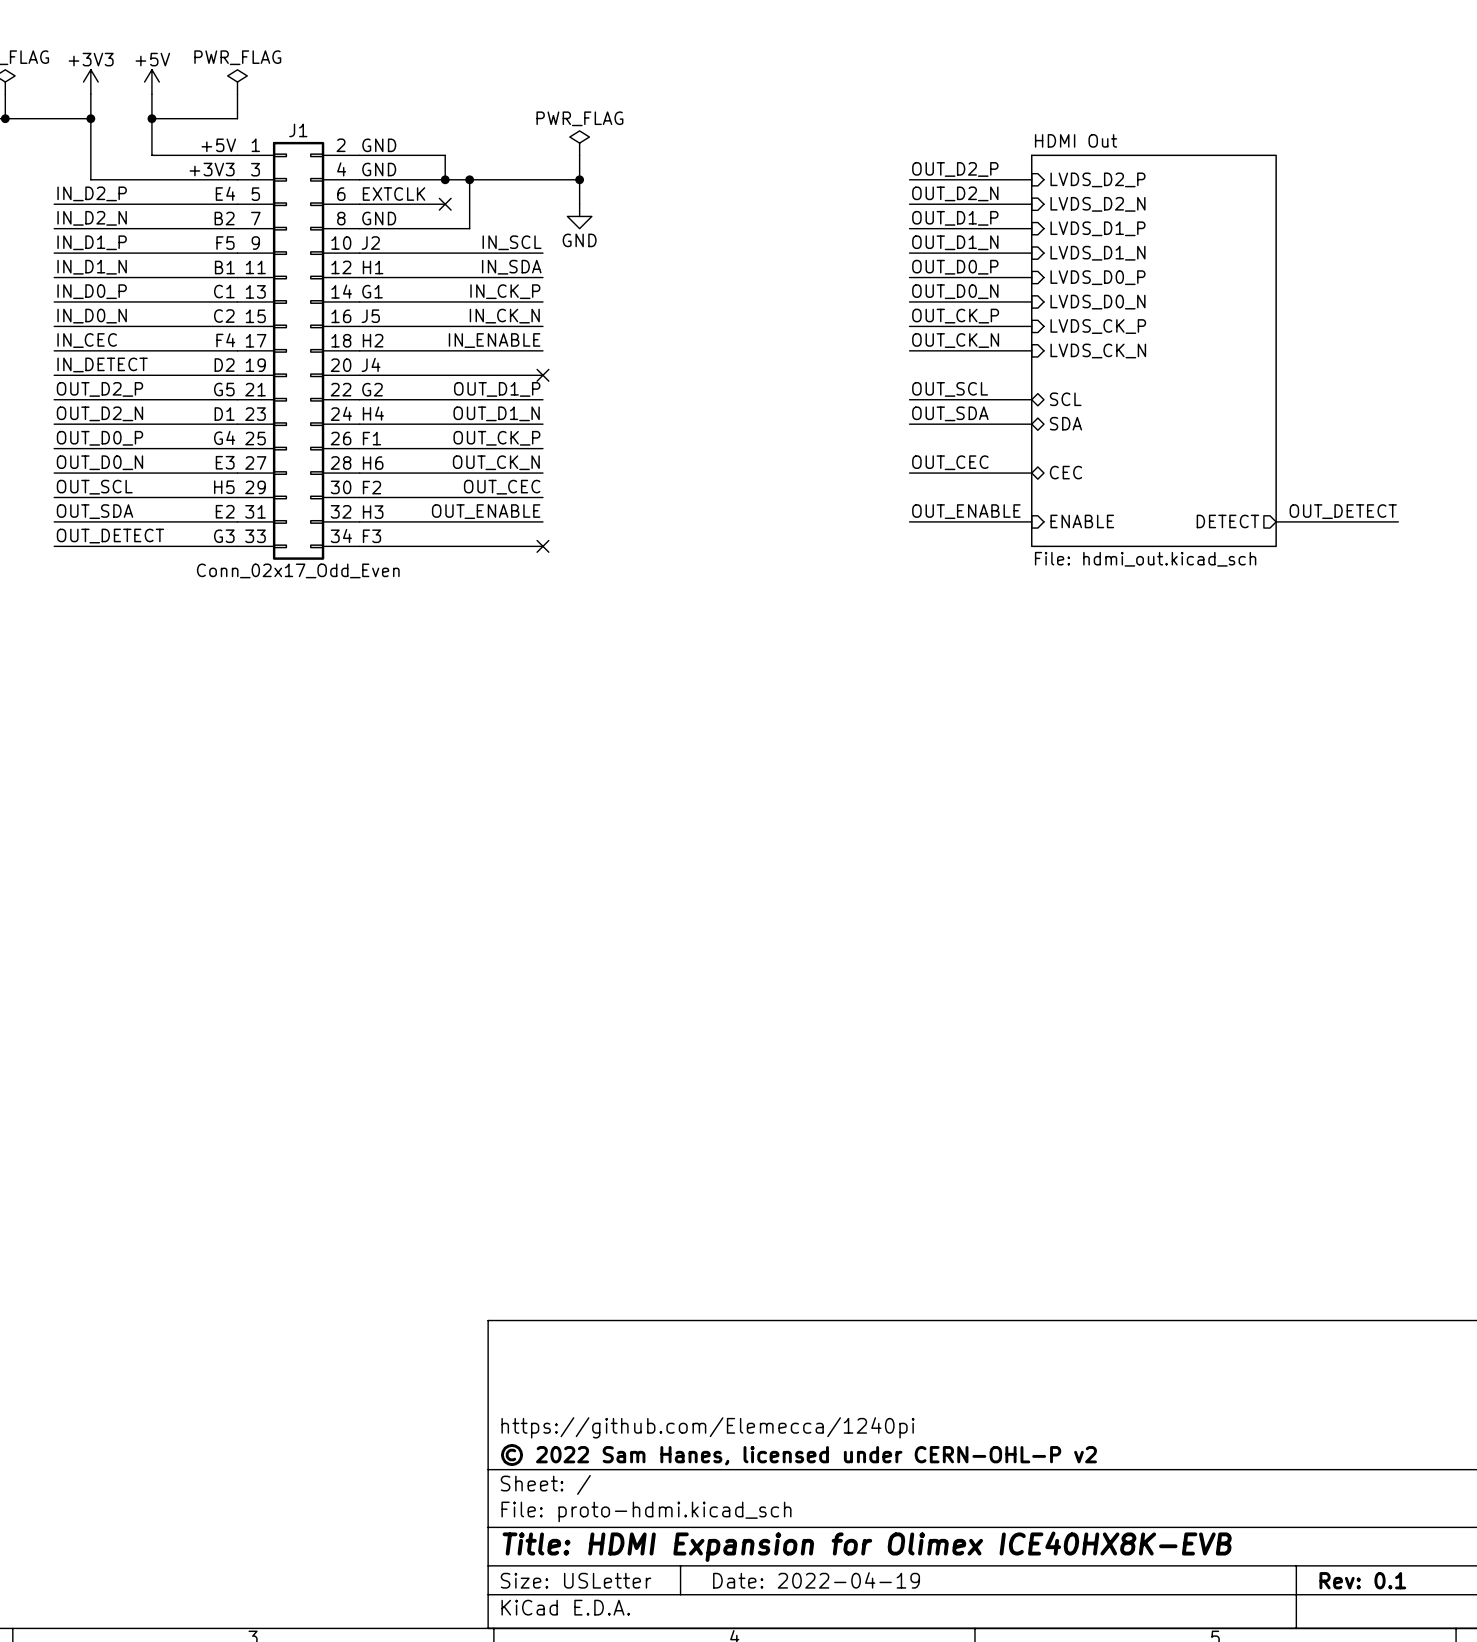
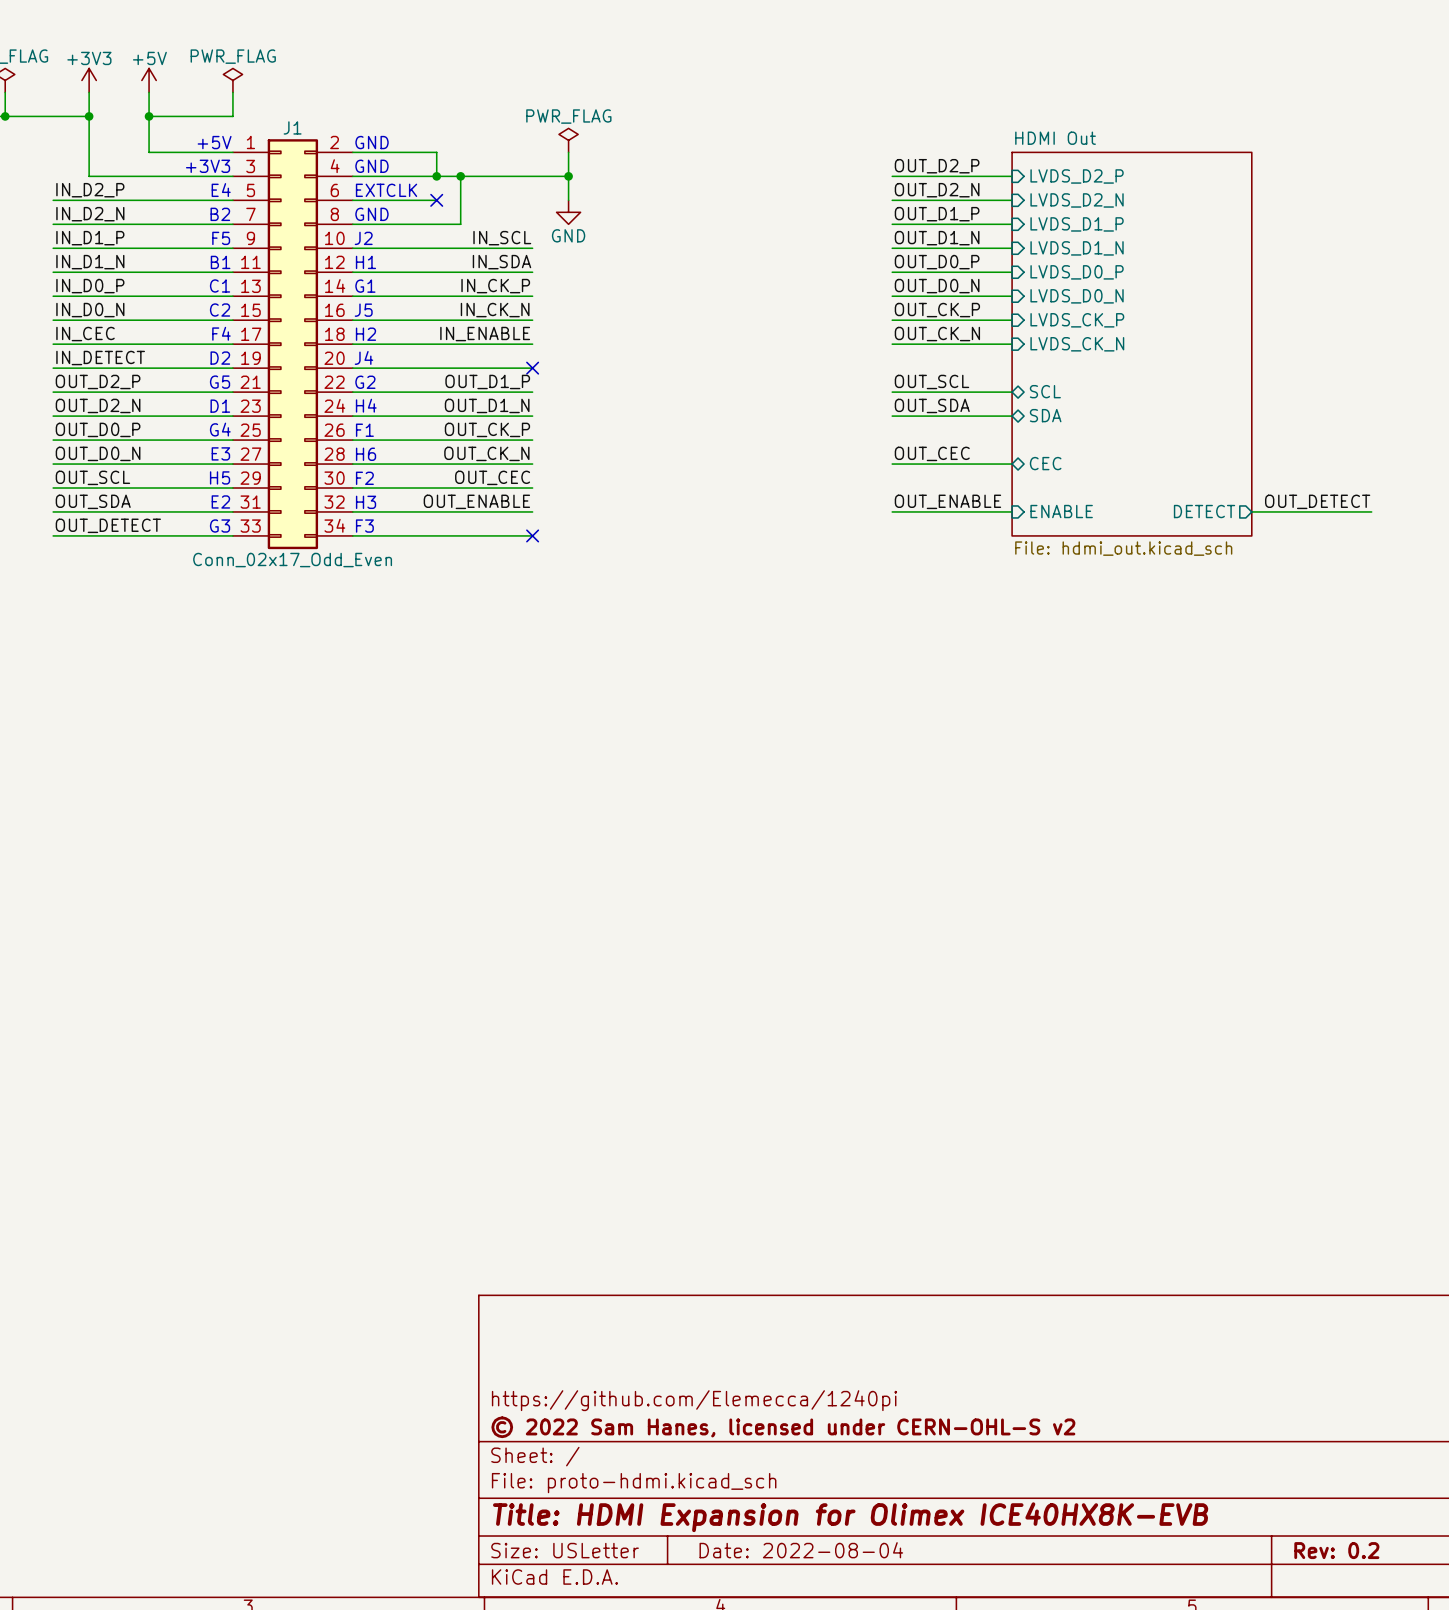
title block: © 2022 Sam Hanes, licensed under CERN-OHL-P v2 (798, 1455) -> © 2022 Sam Hanes, licensed under CERN-OHL-S v2 (783, 1427)
title block: Date: 2022-04-19 (816, 1580) -> Date: 2022-08-04 (801, 1550)
title block: Rev: 0.1 (1362, 1580) -> Rev: 0.2 (1336, 1550)

